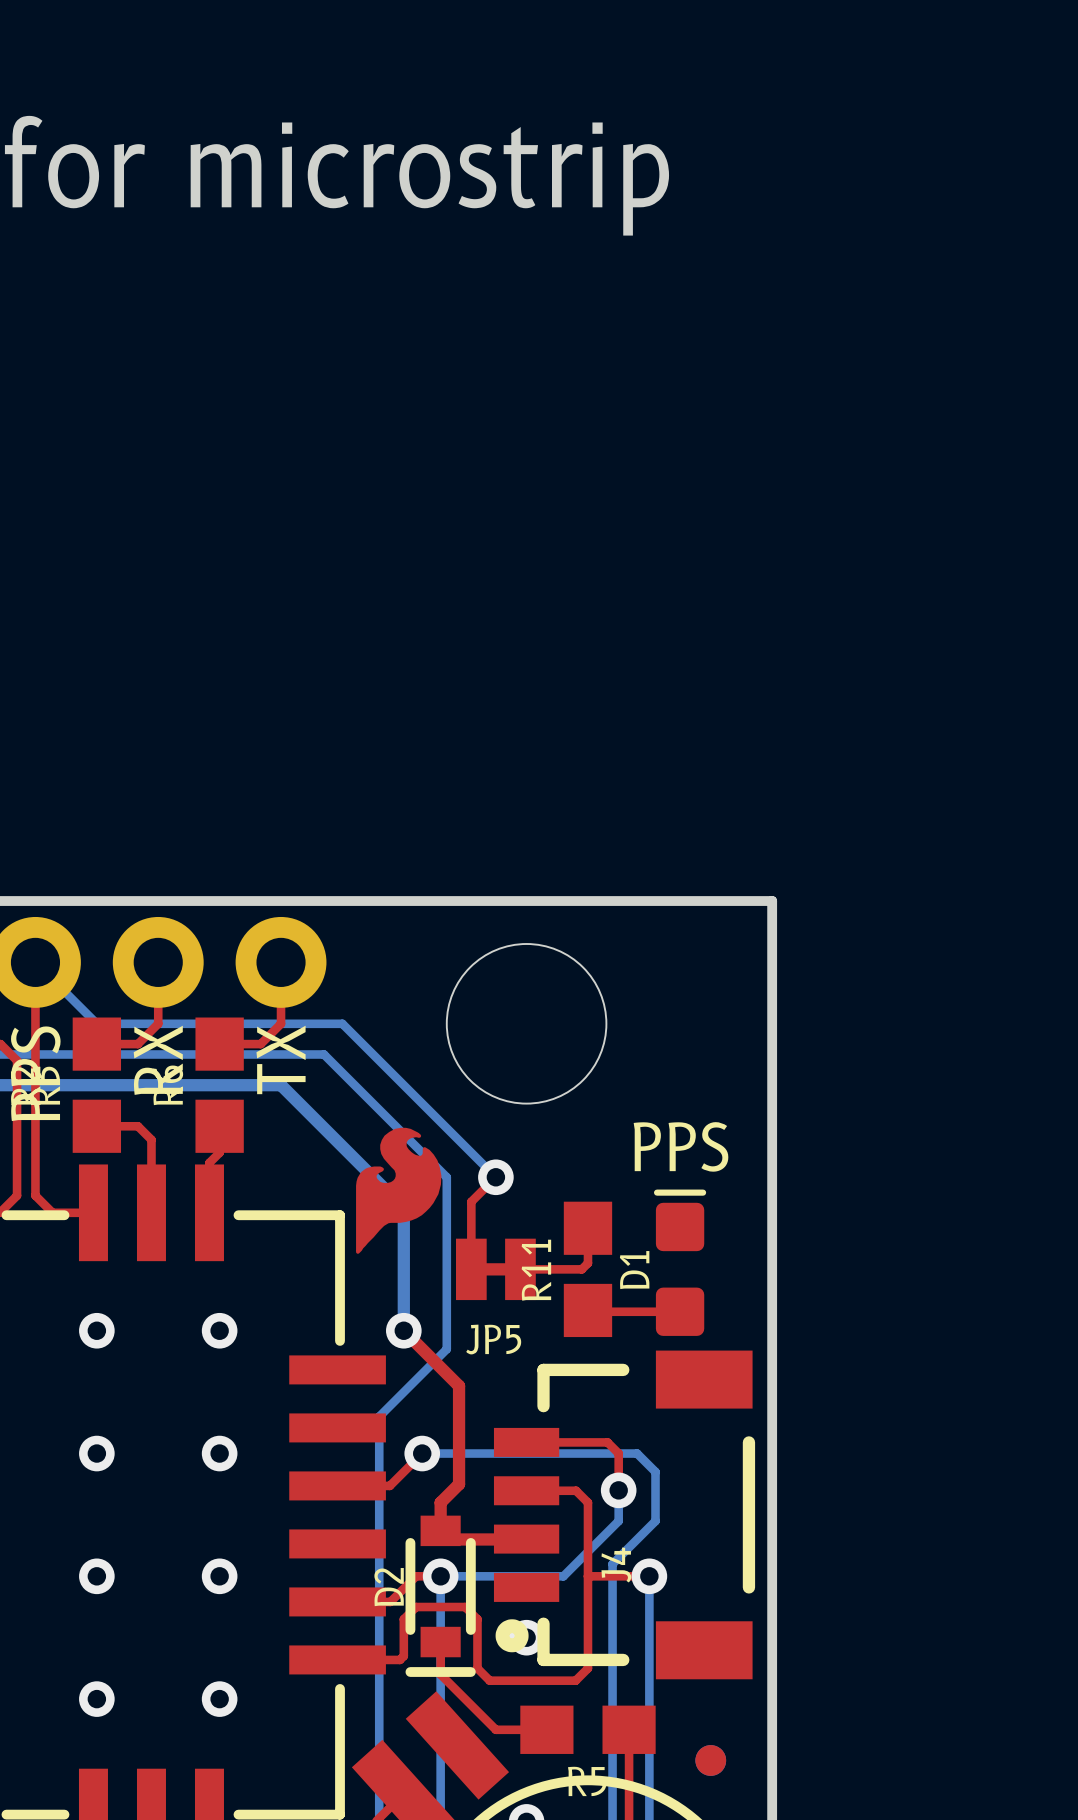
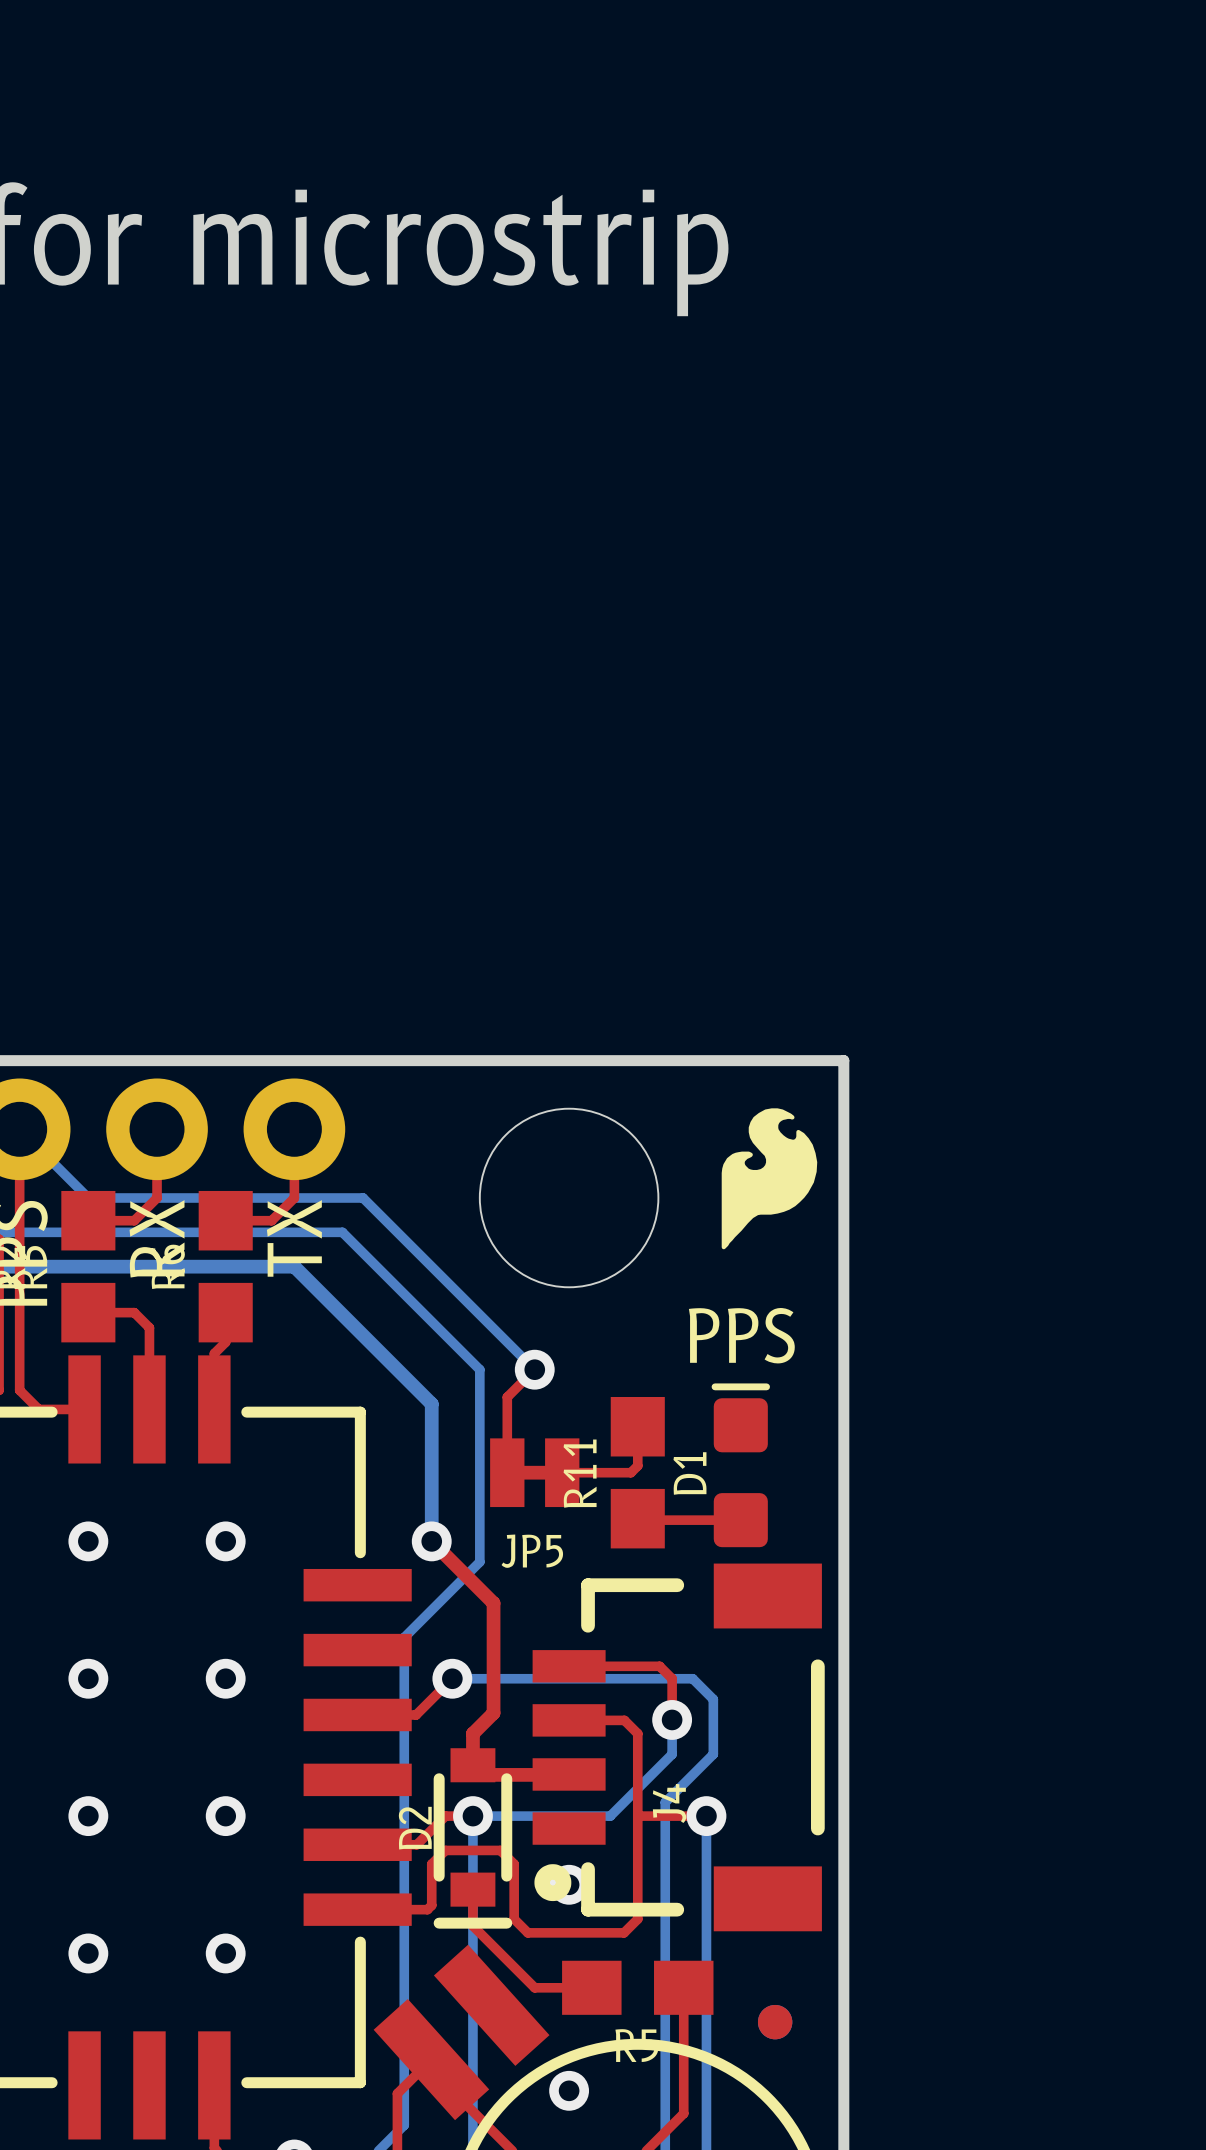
drawing: none -> [721, 1108, 818, 1250]
drawing: [356, 1127, 442, 1254] -> none

